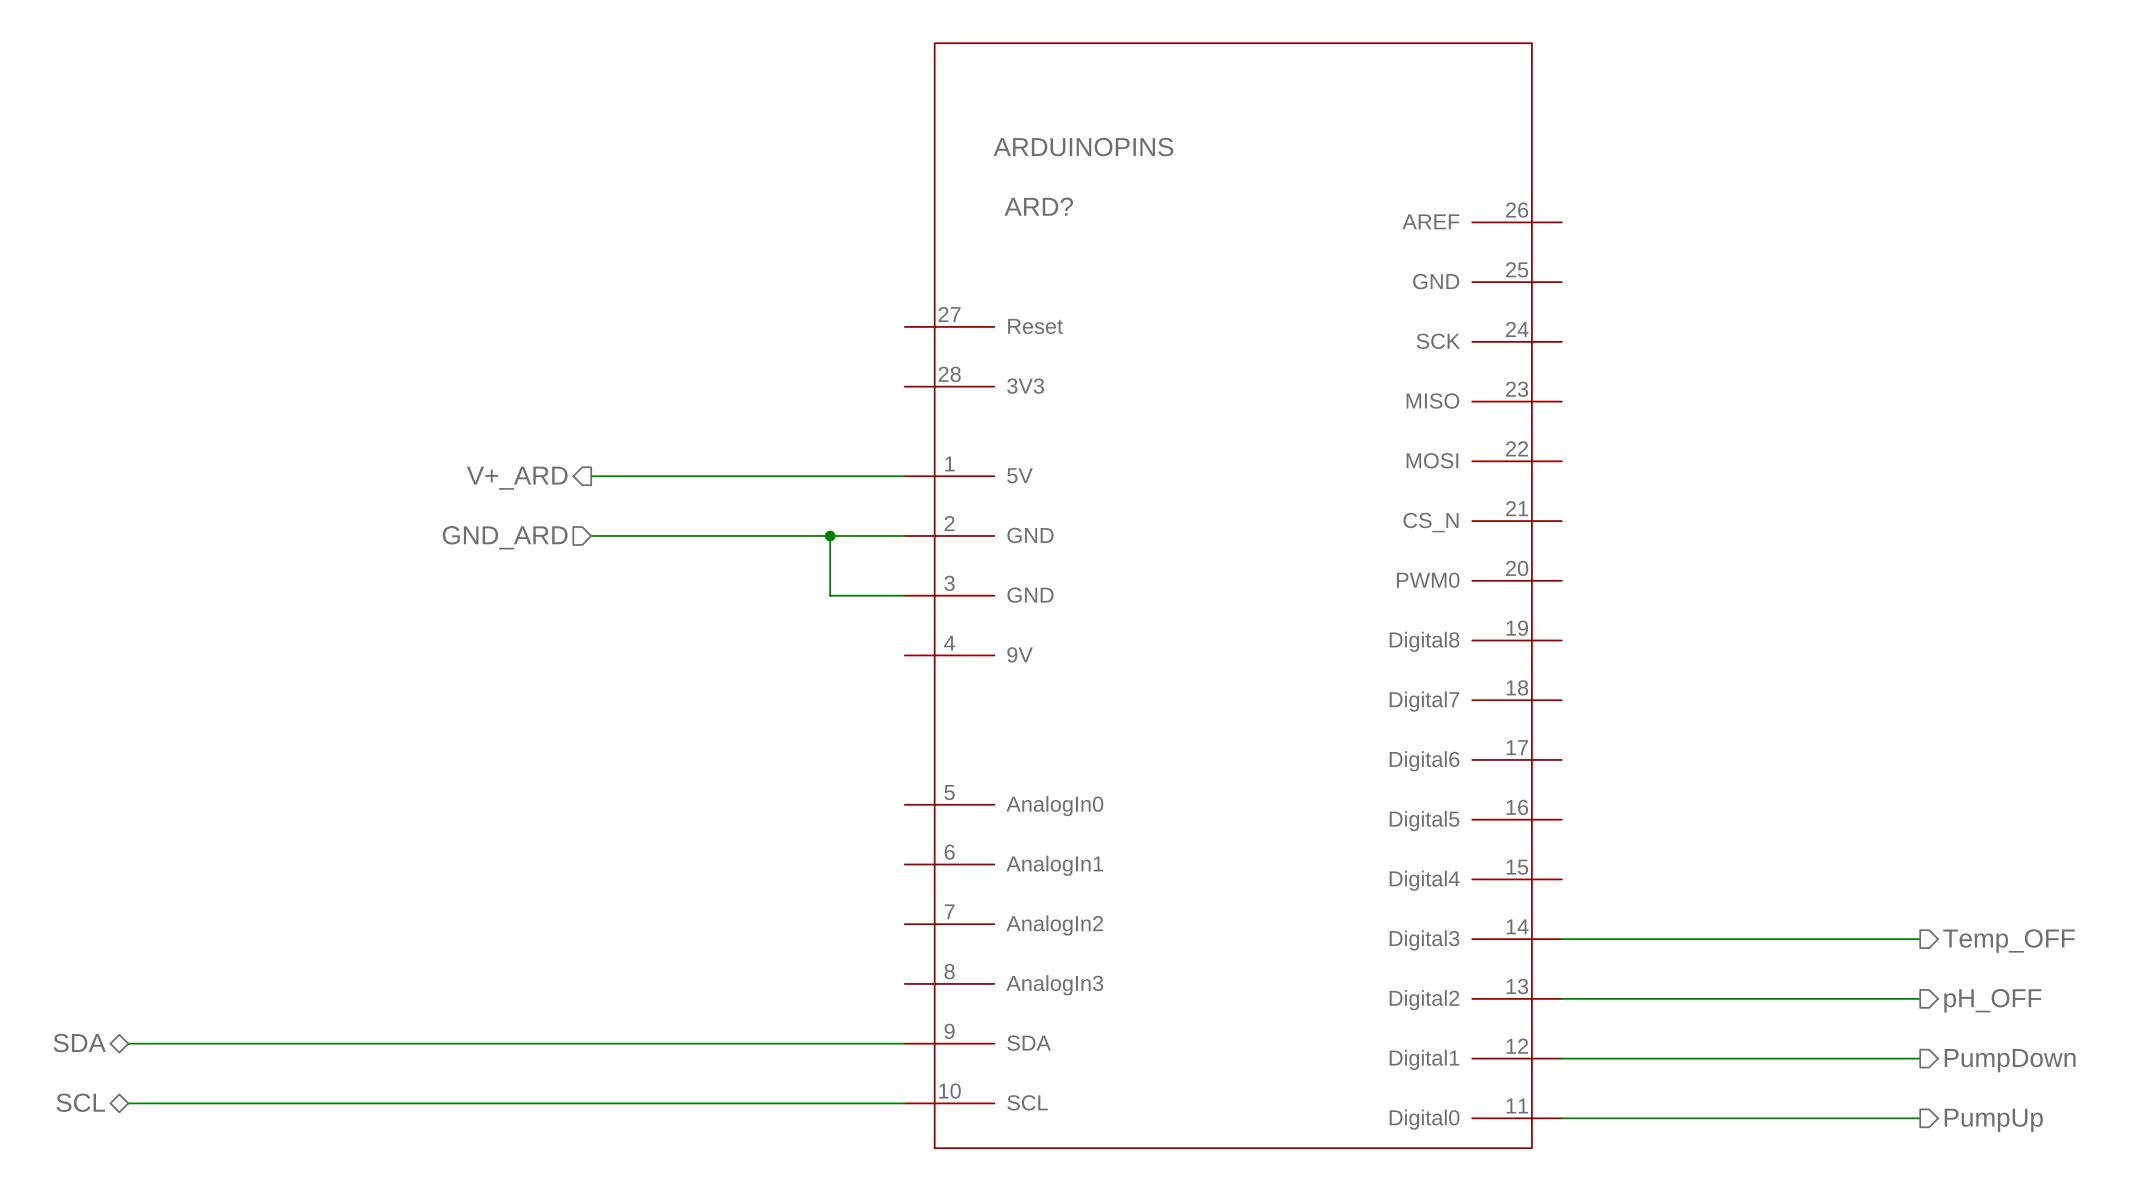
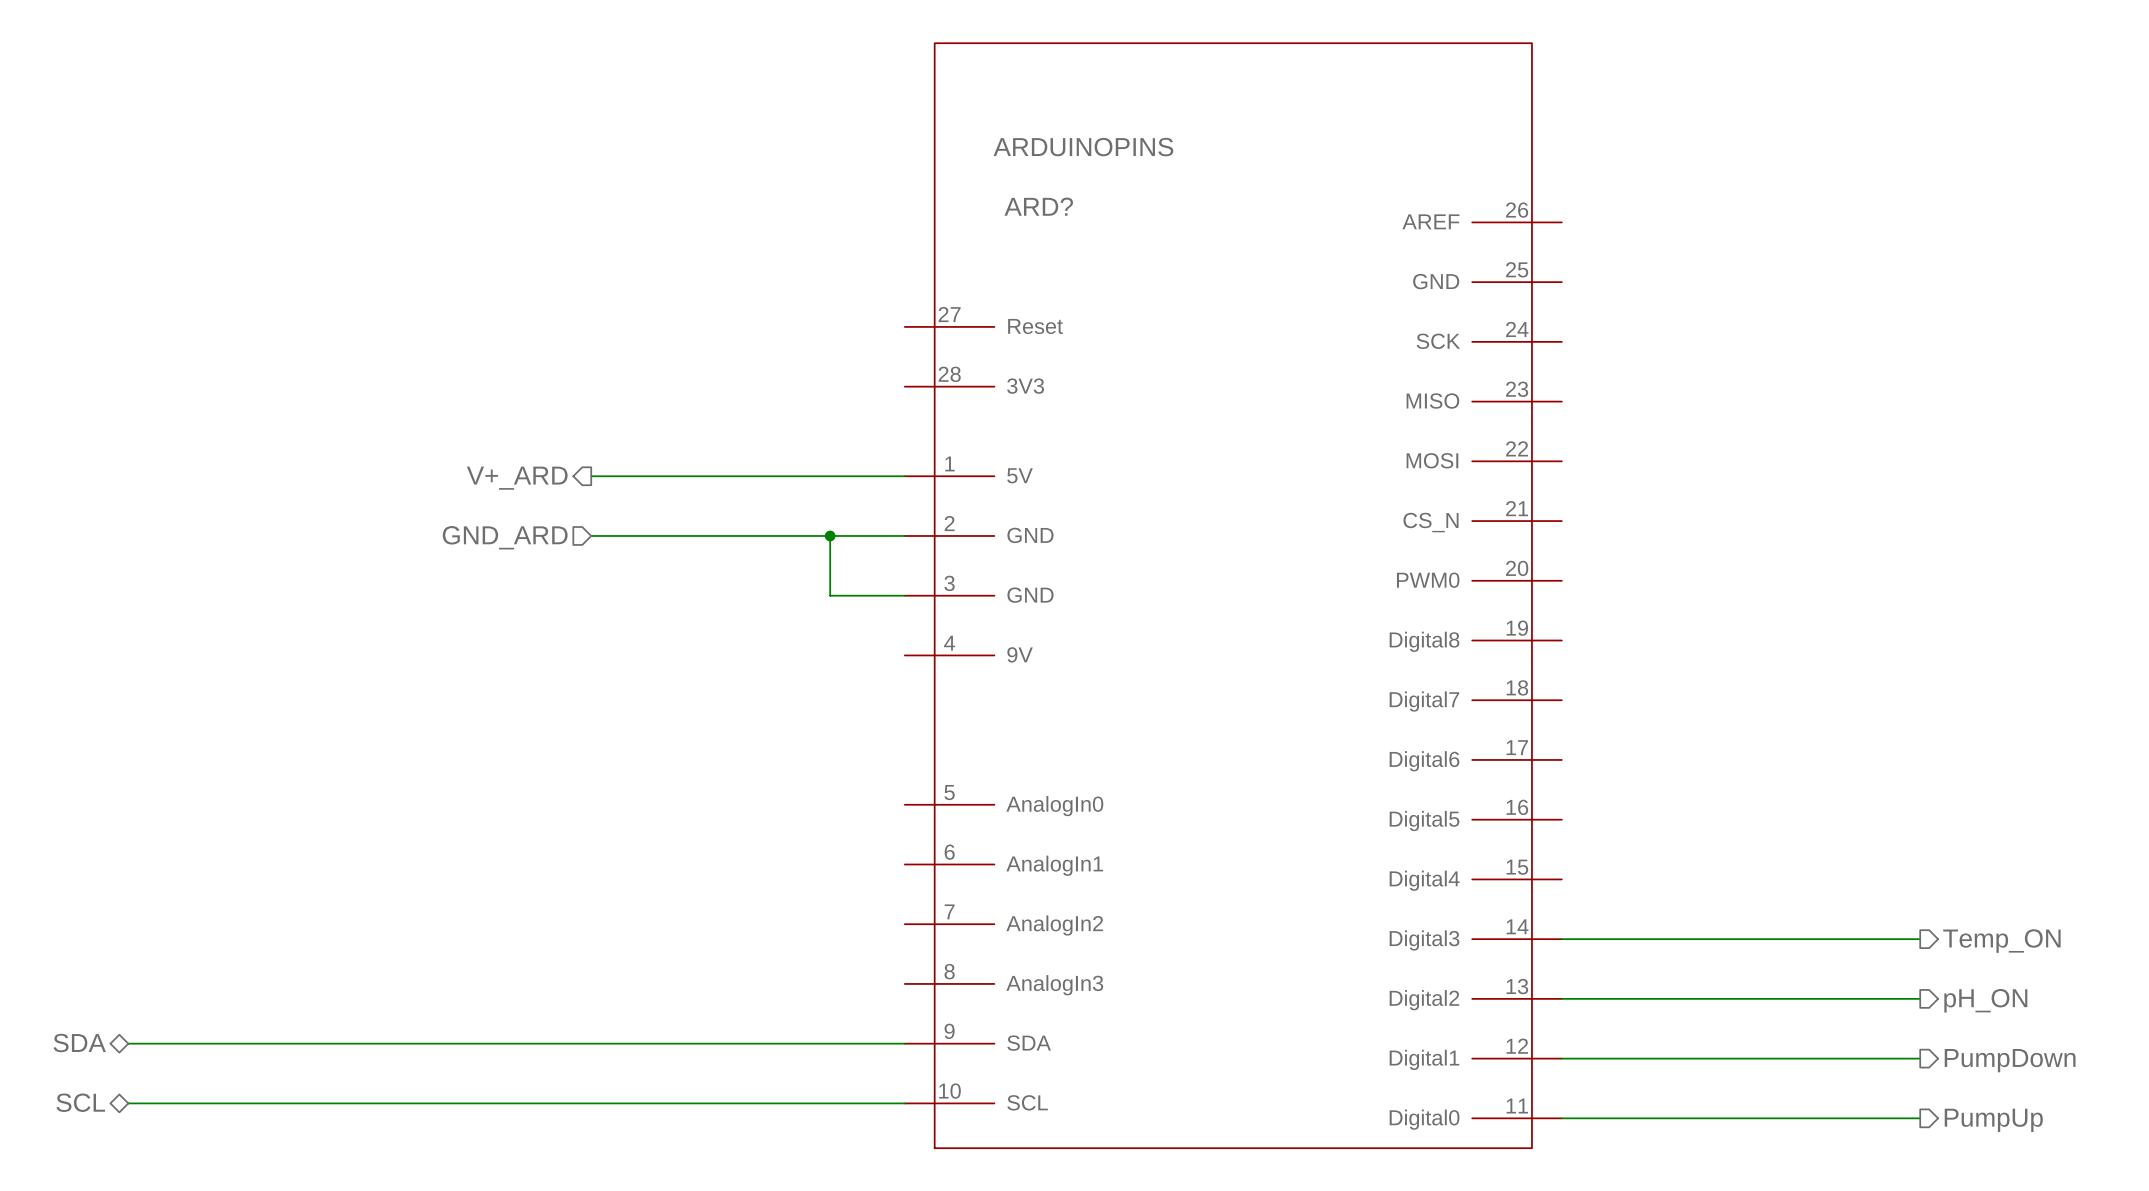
hierarchical label: Temp_OFF (2008, 941) -> Temp_ON (2001, 941)
hierarchical label: pH_OFF (1992, 1000) -> pH_ON (1985, 1000)

